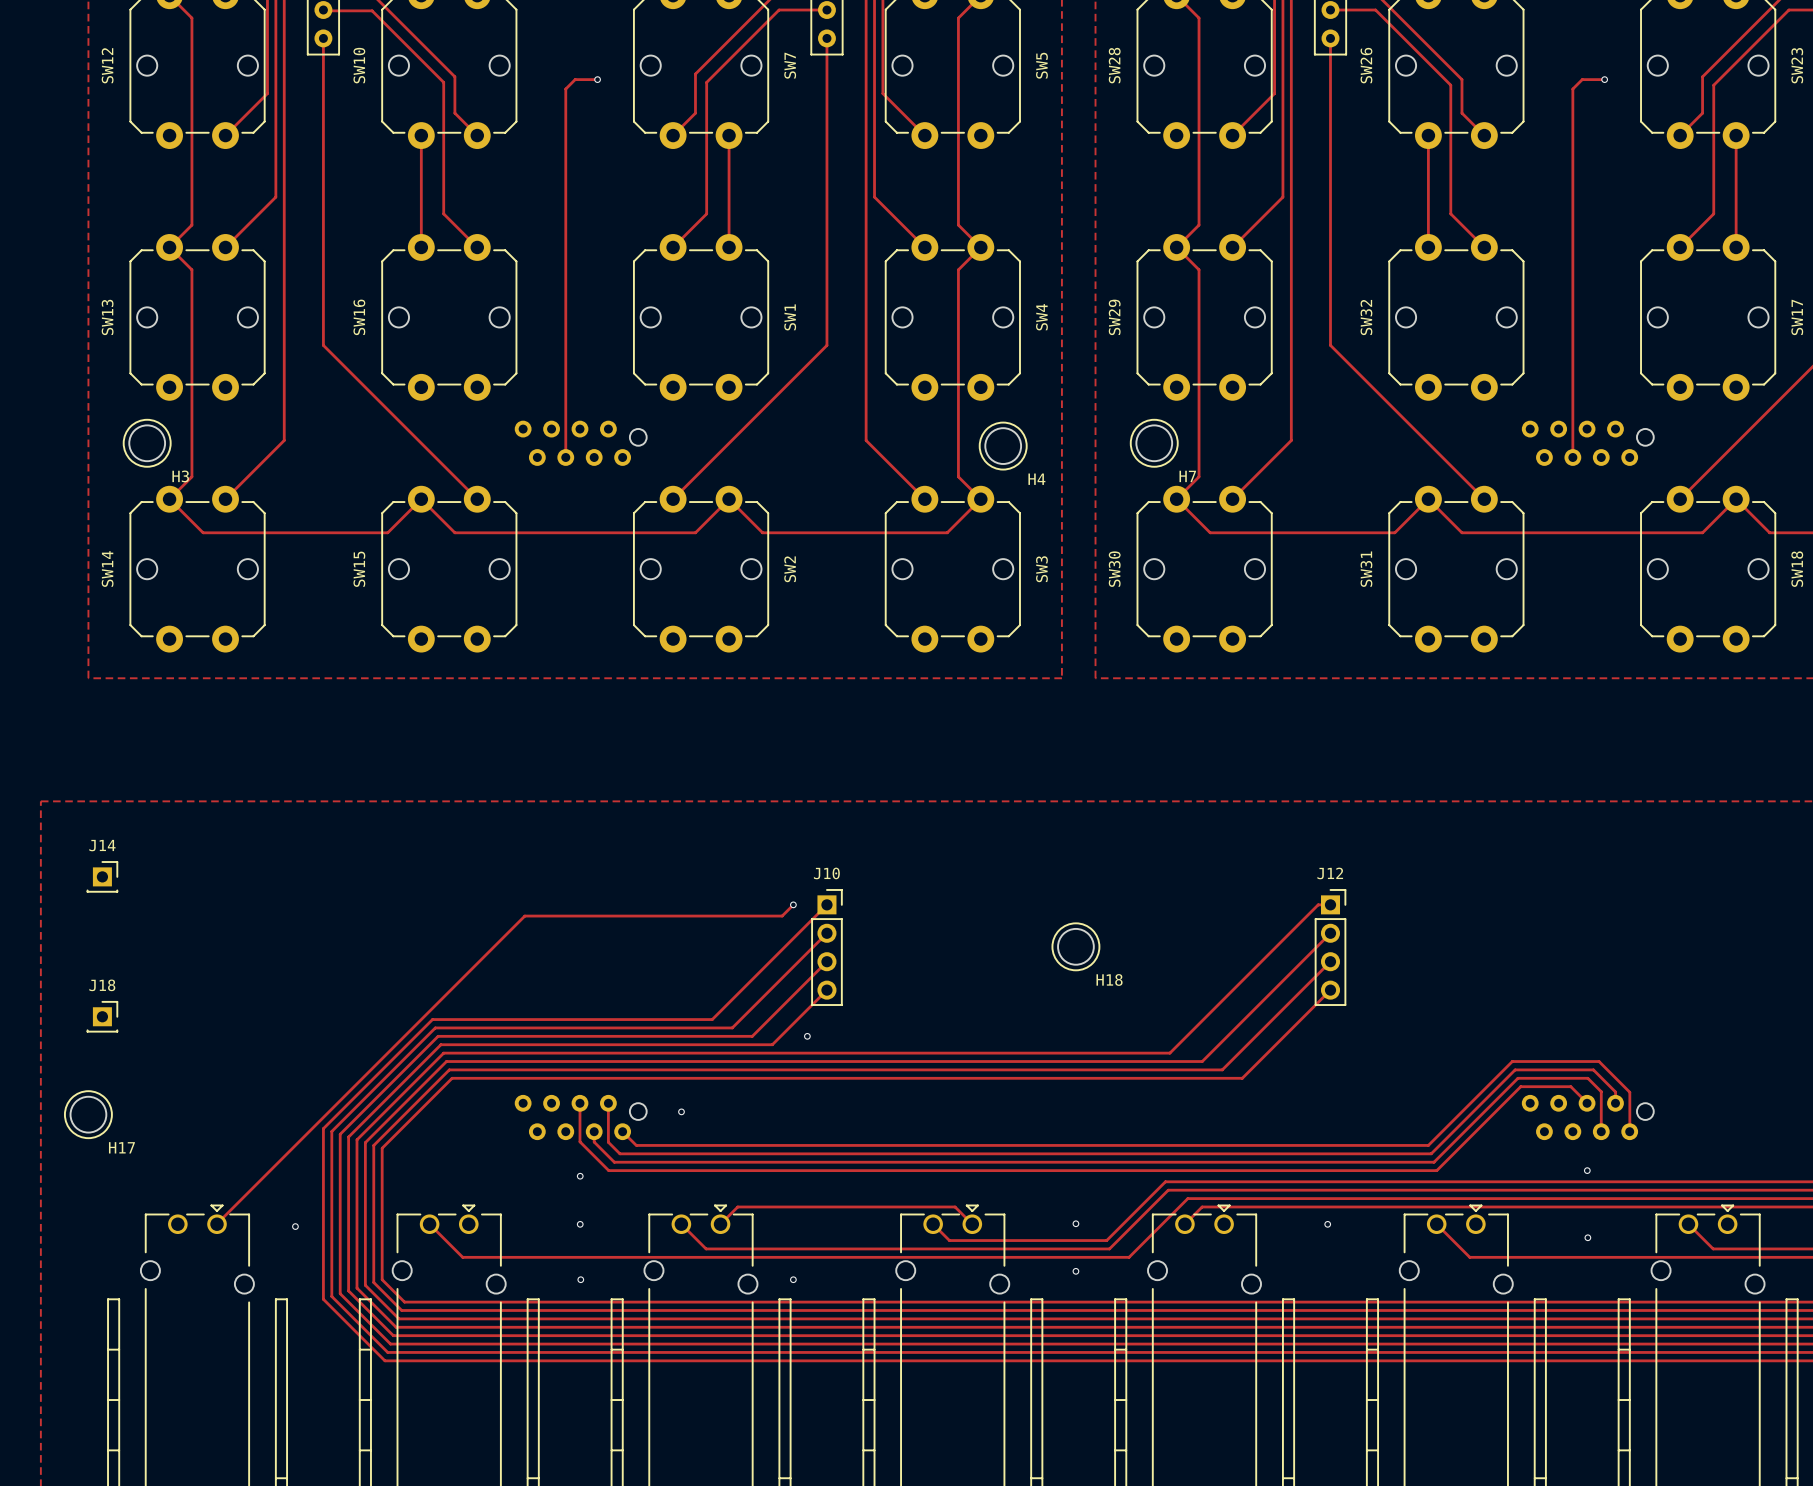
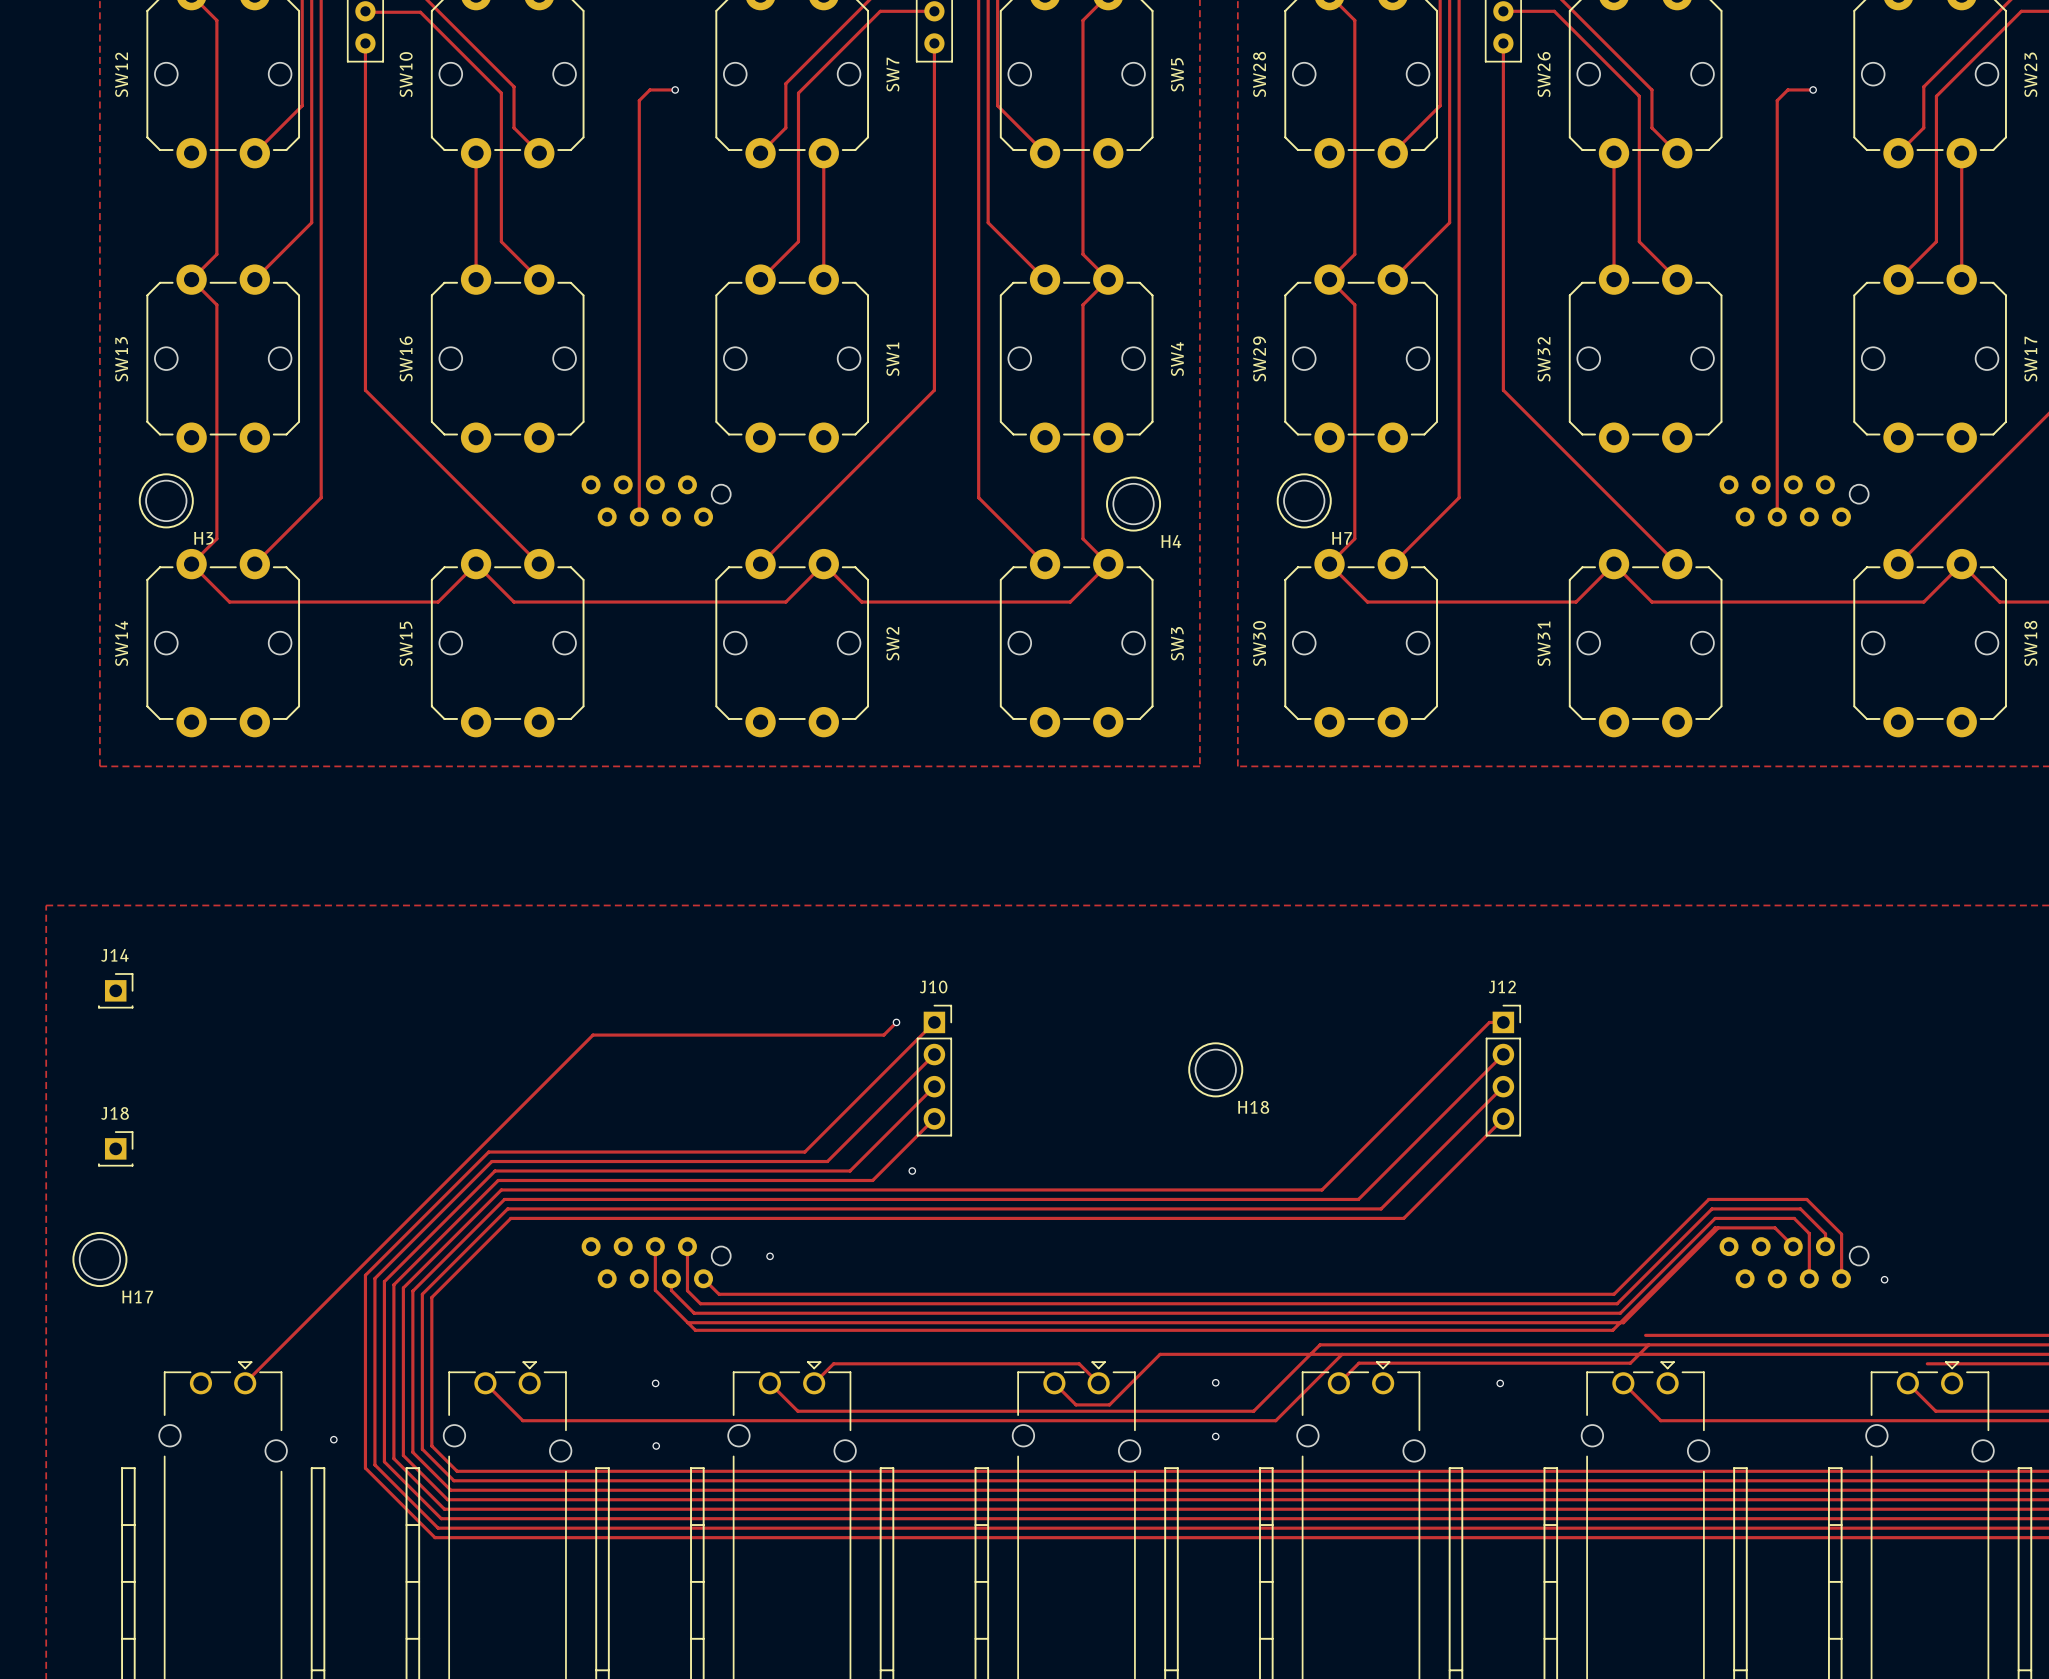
track: none -> (1718, 1227) (1715, 1227) (1612, 1330) (695, 1330) (687, 1322)
via: none -> (1884, 1279)
via: (1587, 1170) -> none
via: (580, 1176) -> none
track: (1456, 1181) (1165, 1181) (1106, 1240) (949, 1240) -> (1342, 1354) (1160, 1354) (1109, 1404) (1076, 1404) (1072, 1401)
track: (1202, 1206) (1705, 1206) -> (1358, 1363) (1630, 1363) (1648, 1344)
via position: (295, 1226) -> (333, 1439)
via: (1587, 1237) -> none
via: (793, 1279) -> none

